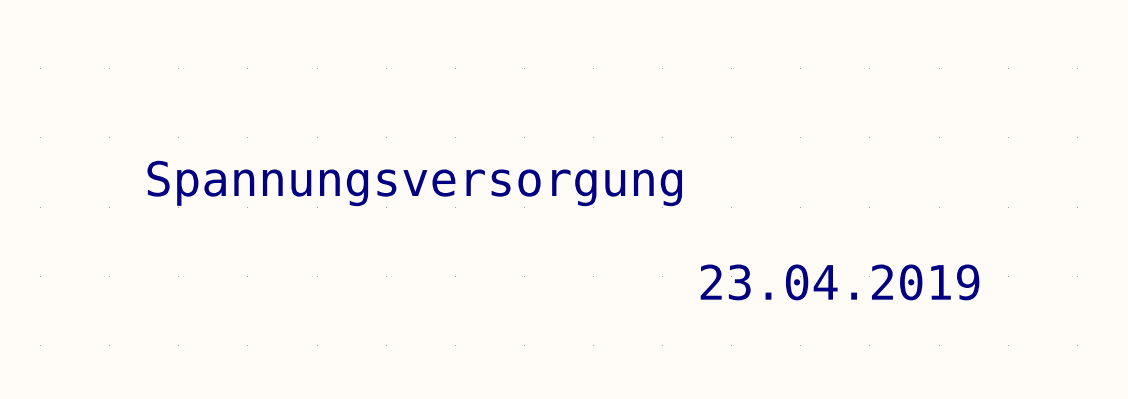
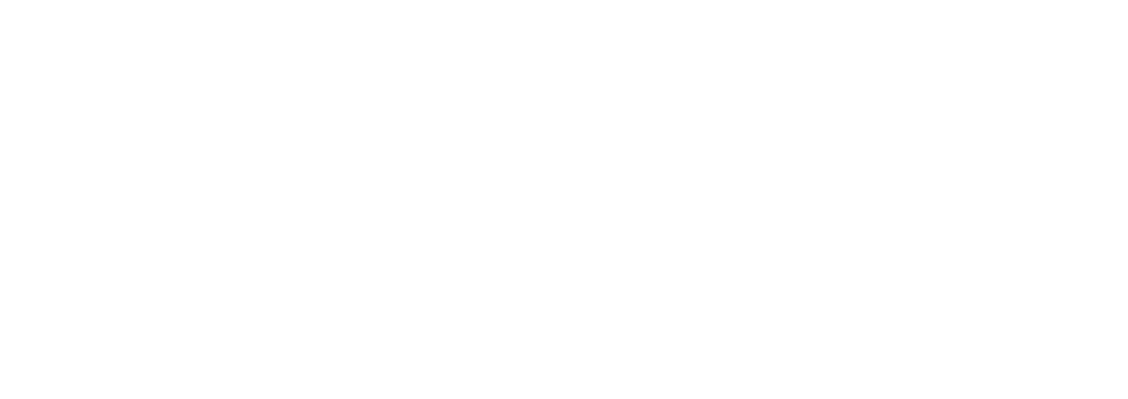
text: Spannungsversorgung (414, 183) -> none
text: 23.04.2019 (840, 282) -> none

